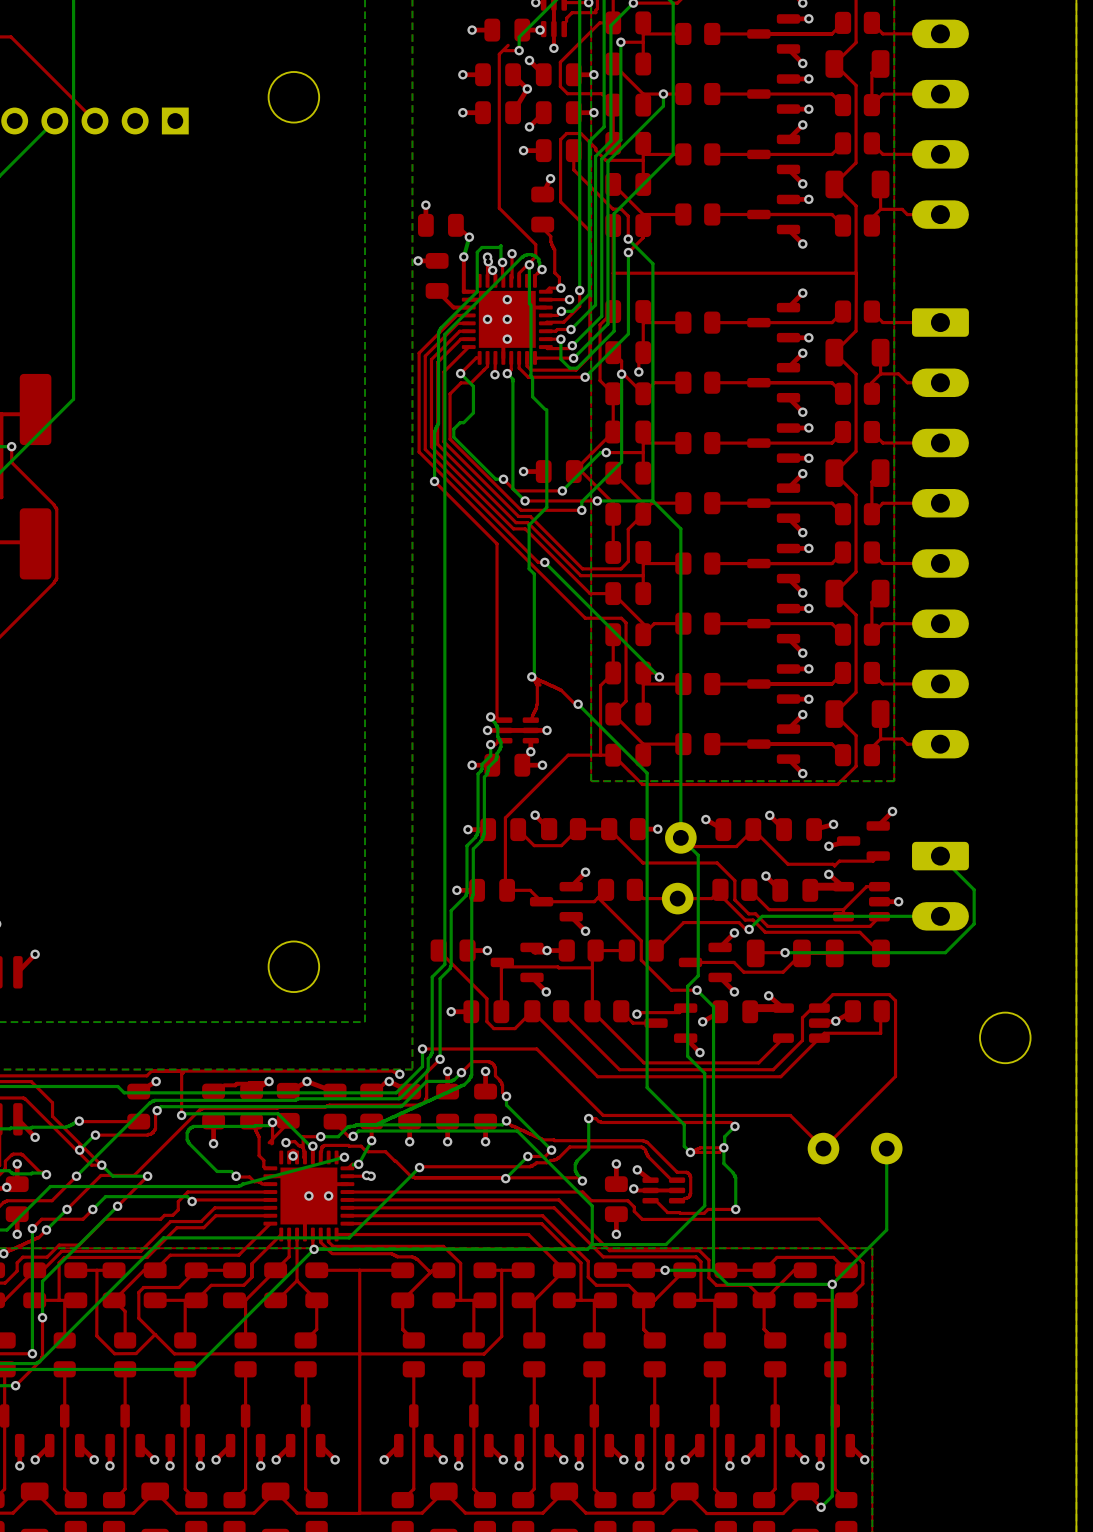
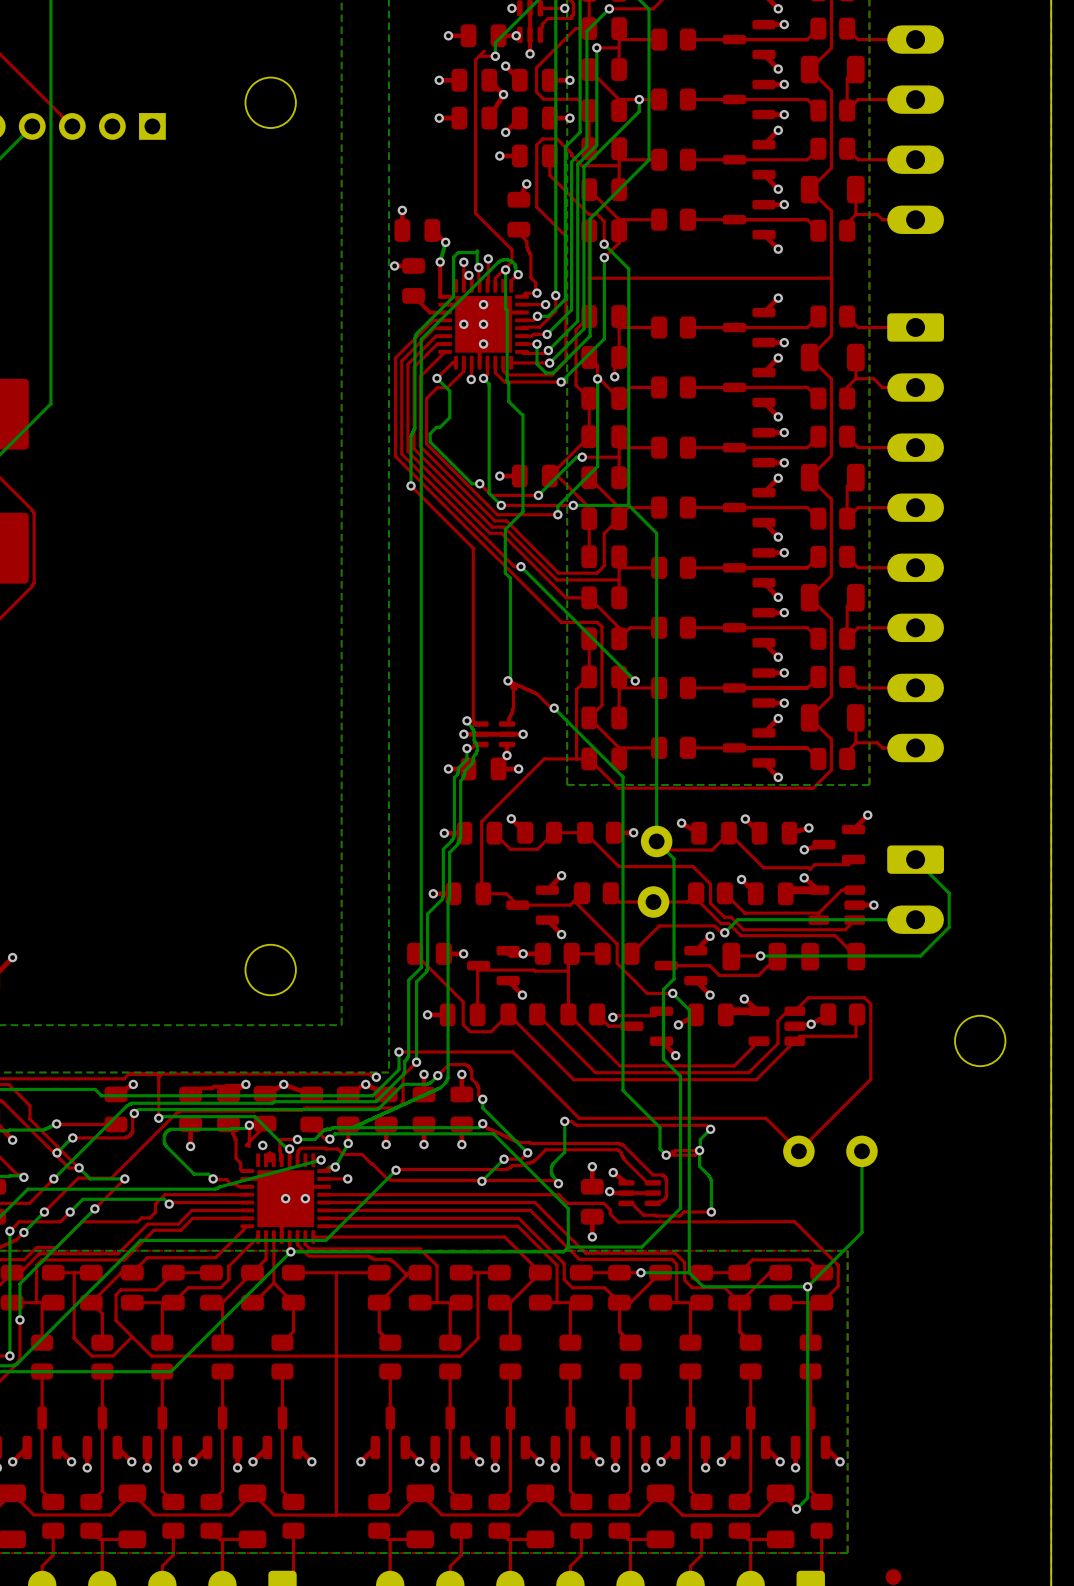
via: (488, 261) -> none
top track: (285, 1142) (294, 1141) (303, 1148) -> none
via: (293, 1156) -> none
via: (366, 1175) -> none

